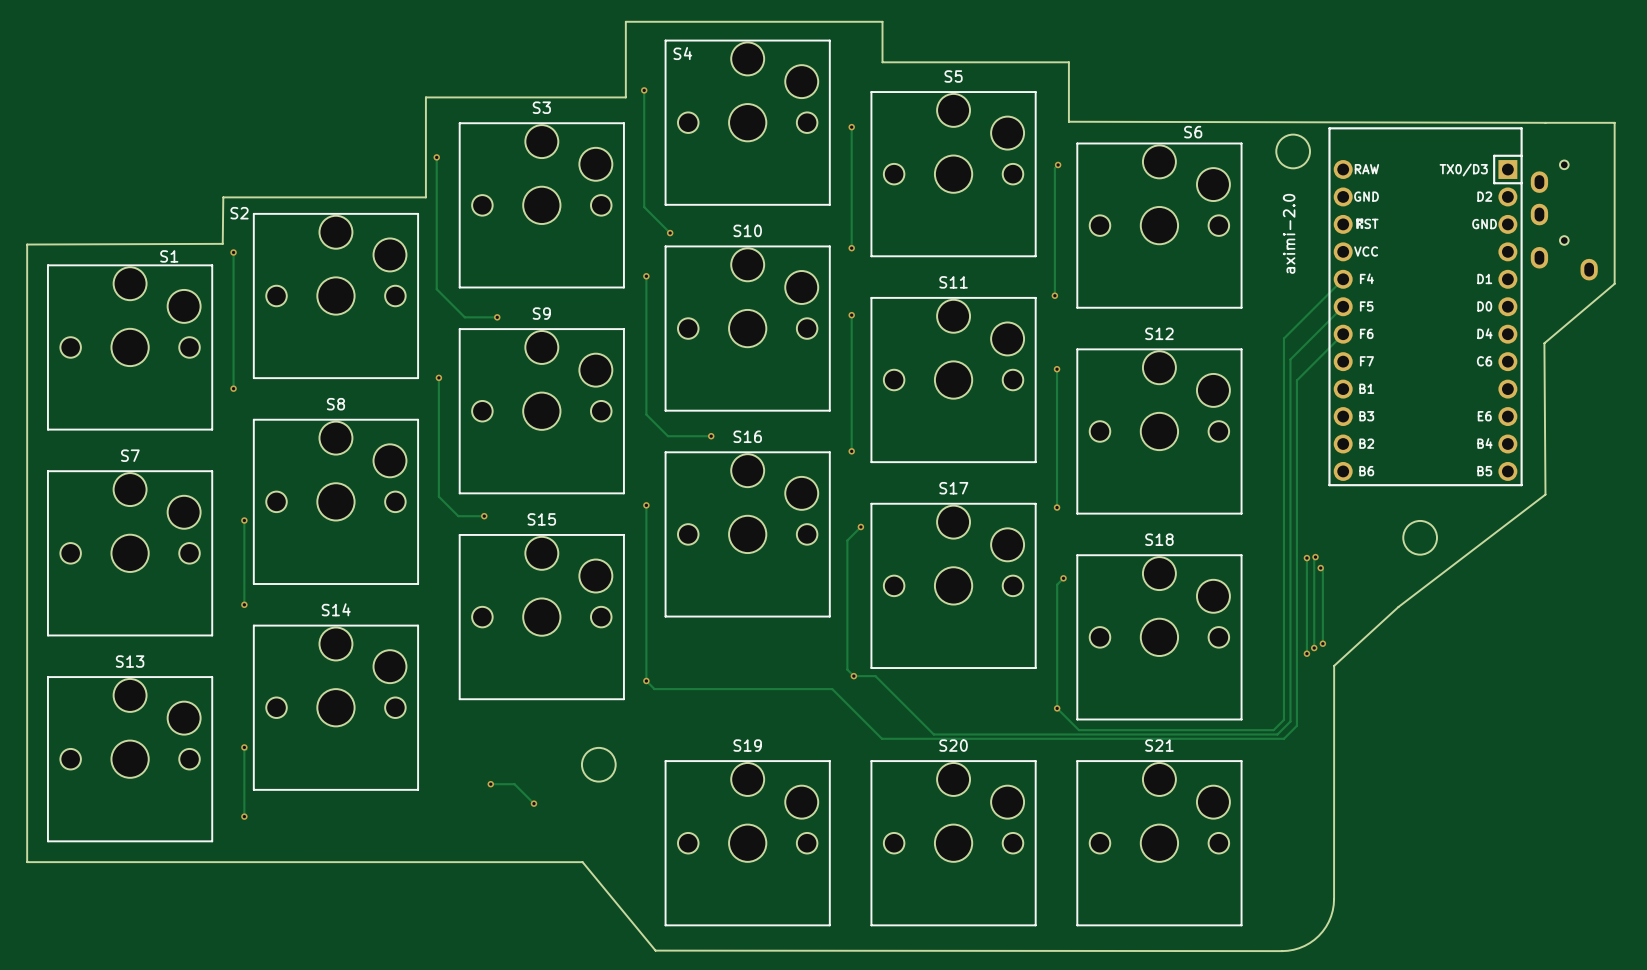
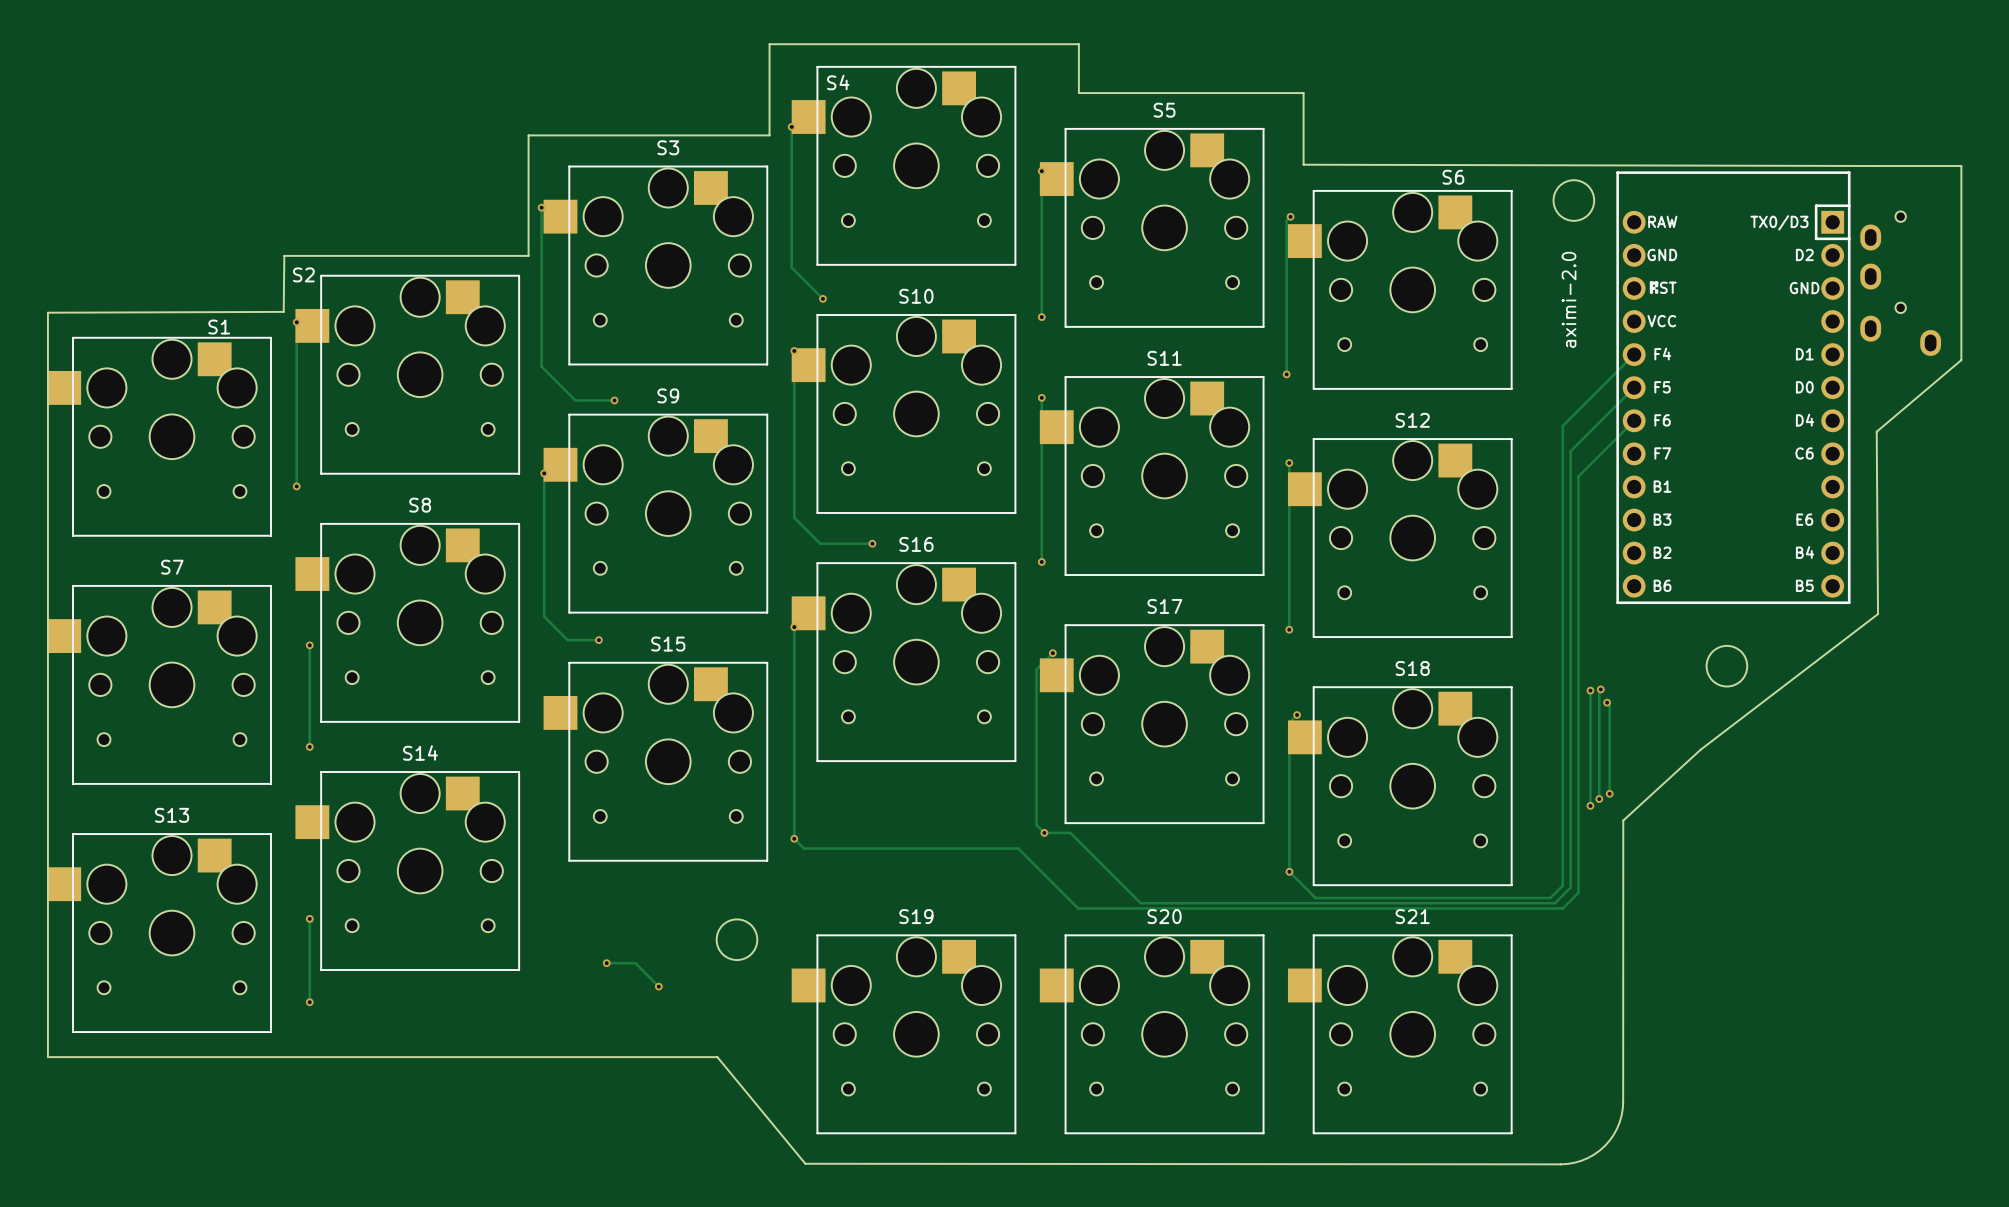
S4 footprint: [664, 39, 831, 206] -> [791, 66, 1017, 266]
S5 footprint: [870, 91, 1037, 257] -> [1039, 128, 1265, 328]
S3 footprint: [459, 122, 625, 289] -> [543, 165, 769, 366]
S6 footprint: [1076, 142, 1243, 309] -> [1287, 190, 1513, 390]
S2 footprint: [253, 213, 419, 379] -> [295, 274, 520, 475]
S10 footprint: [664, 245, 831, 412] -> [791, 314, 1017, 514]
S1 footprint: [47, 264, 213, 431] -> [47, 337, 272, 537]
S11 footprint: [870, 297, 1037, 463] -> [1039, 376, 1265, 576]
S9 footprint: [459, 328, 625, 495] -> [543, 413, 769, 614]
S12 footprint: [1076, 348, 1243, 515] -> [1287, 438, 1513, 638]
S8 footprint: [253, 419, 419, 585] -> [295, 523, 520, 723]
S16 footprint: [664, 451, 831, 618] -> [791, 562, 1017, 762]
S7 footprint: [47, 470, 213, 637] -> [47, 585, 272, 785]
S17 footprint: [870, 503, 1037, 669] -> [1039, 624, 1265, 824]
S15 footprint: [459, 534, 625, 700] -> [543, 661, 769, 862]
S18 footprint: [1076, 554, 1243, 721] -> [1287, 686, 1513, 886]
S14 footprint: [253, 624, 419, 791] -> [295, 771, 520, 971]
S13 footprint: [47, 676, 213, 842] -> [47, 833, 272, 1033]
S19 footprint: [664, 760, 831, 927] -> [791, 934, 1017, 1135]
S20 footprint: [870, 760, 1037, 927] -> [1039, 934, 1265, 1135]
S21 footprint: [1076, 760, 1243, 927] -> [1287, 934, 1513, 1135]

